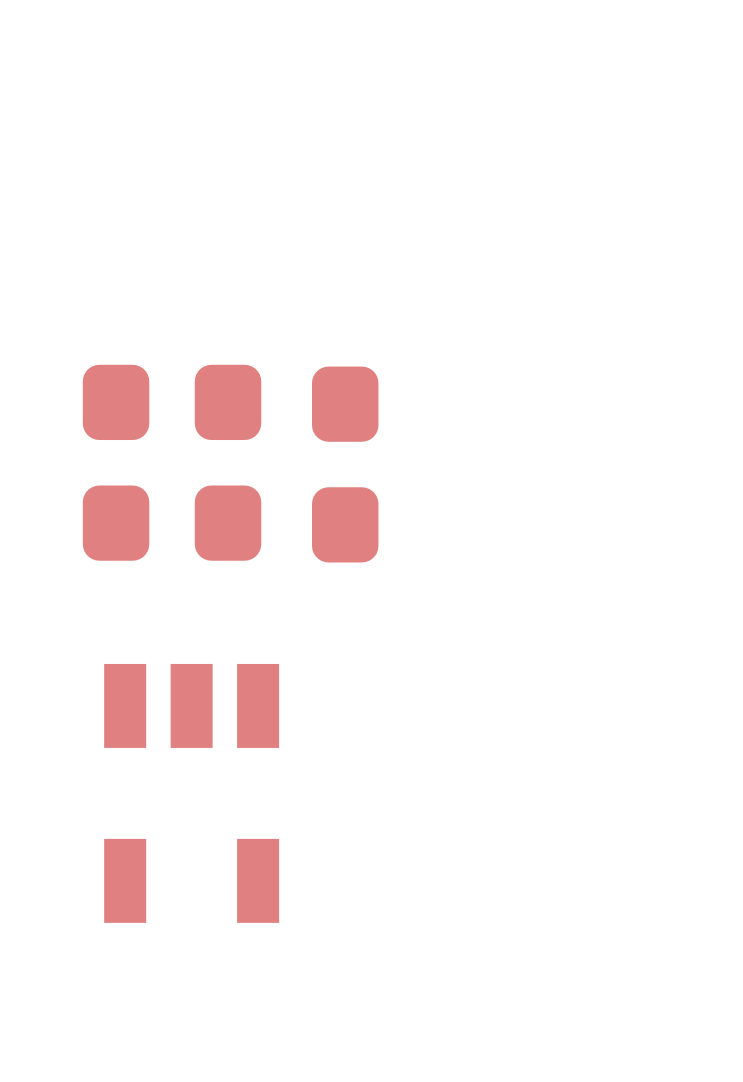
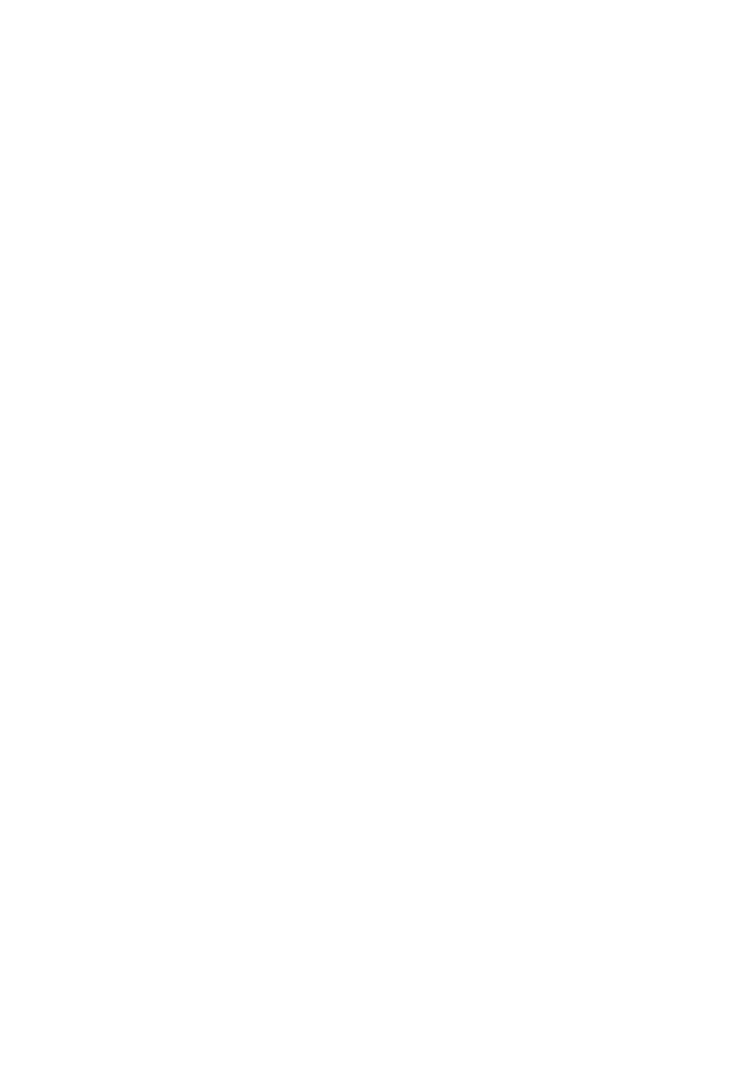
part: (116, 462) -> none
part: (228, 462) -> none
part: (345, 464) -> none
part: (191, 793) -> none

